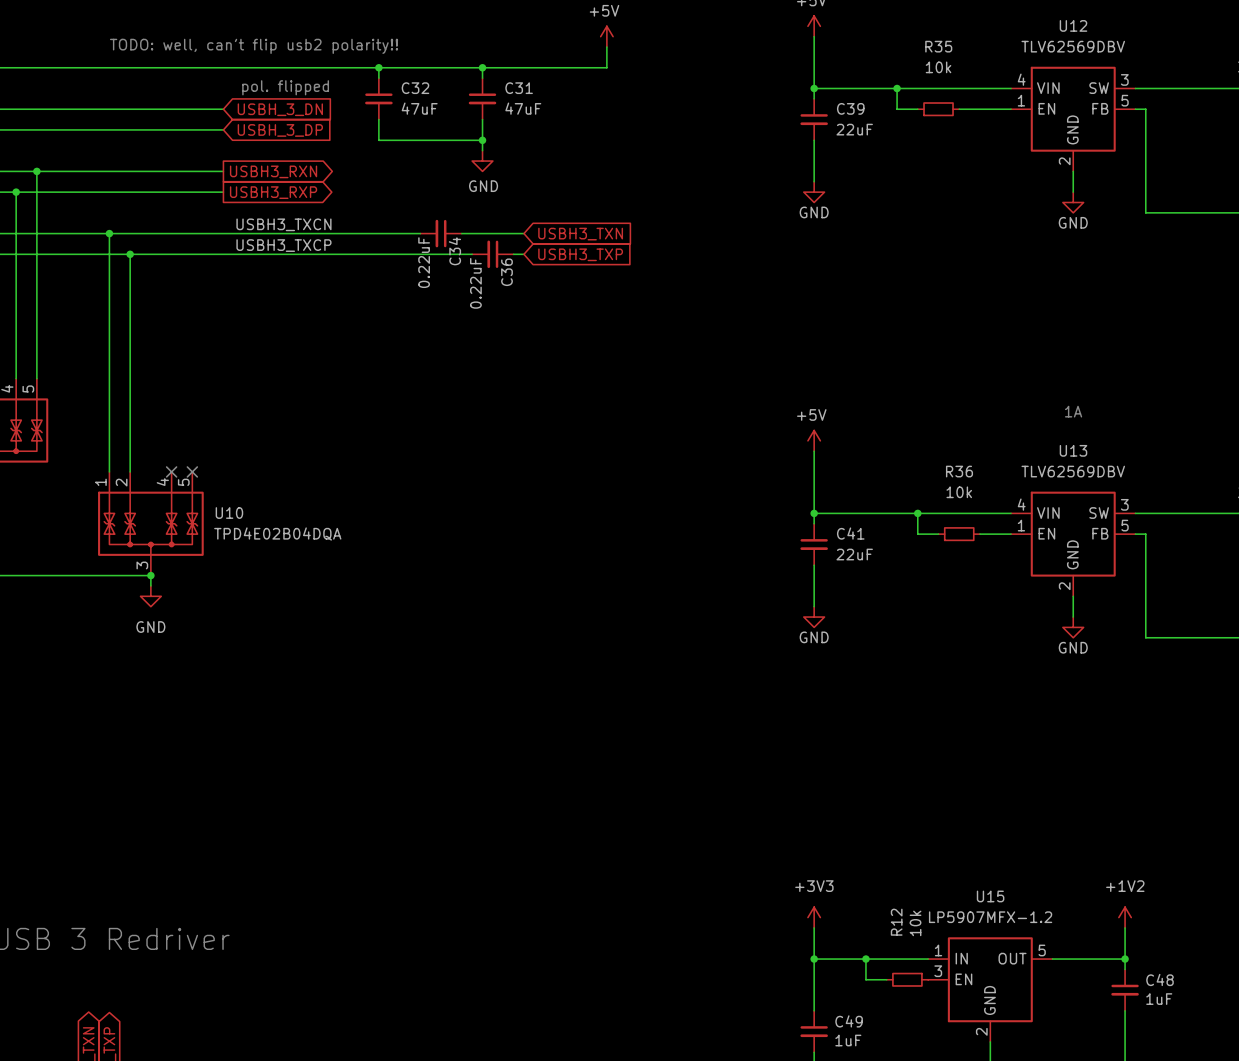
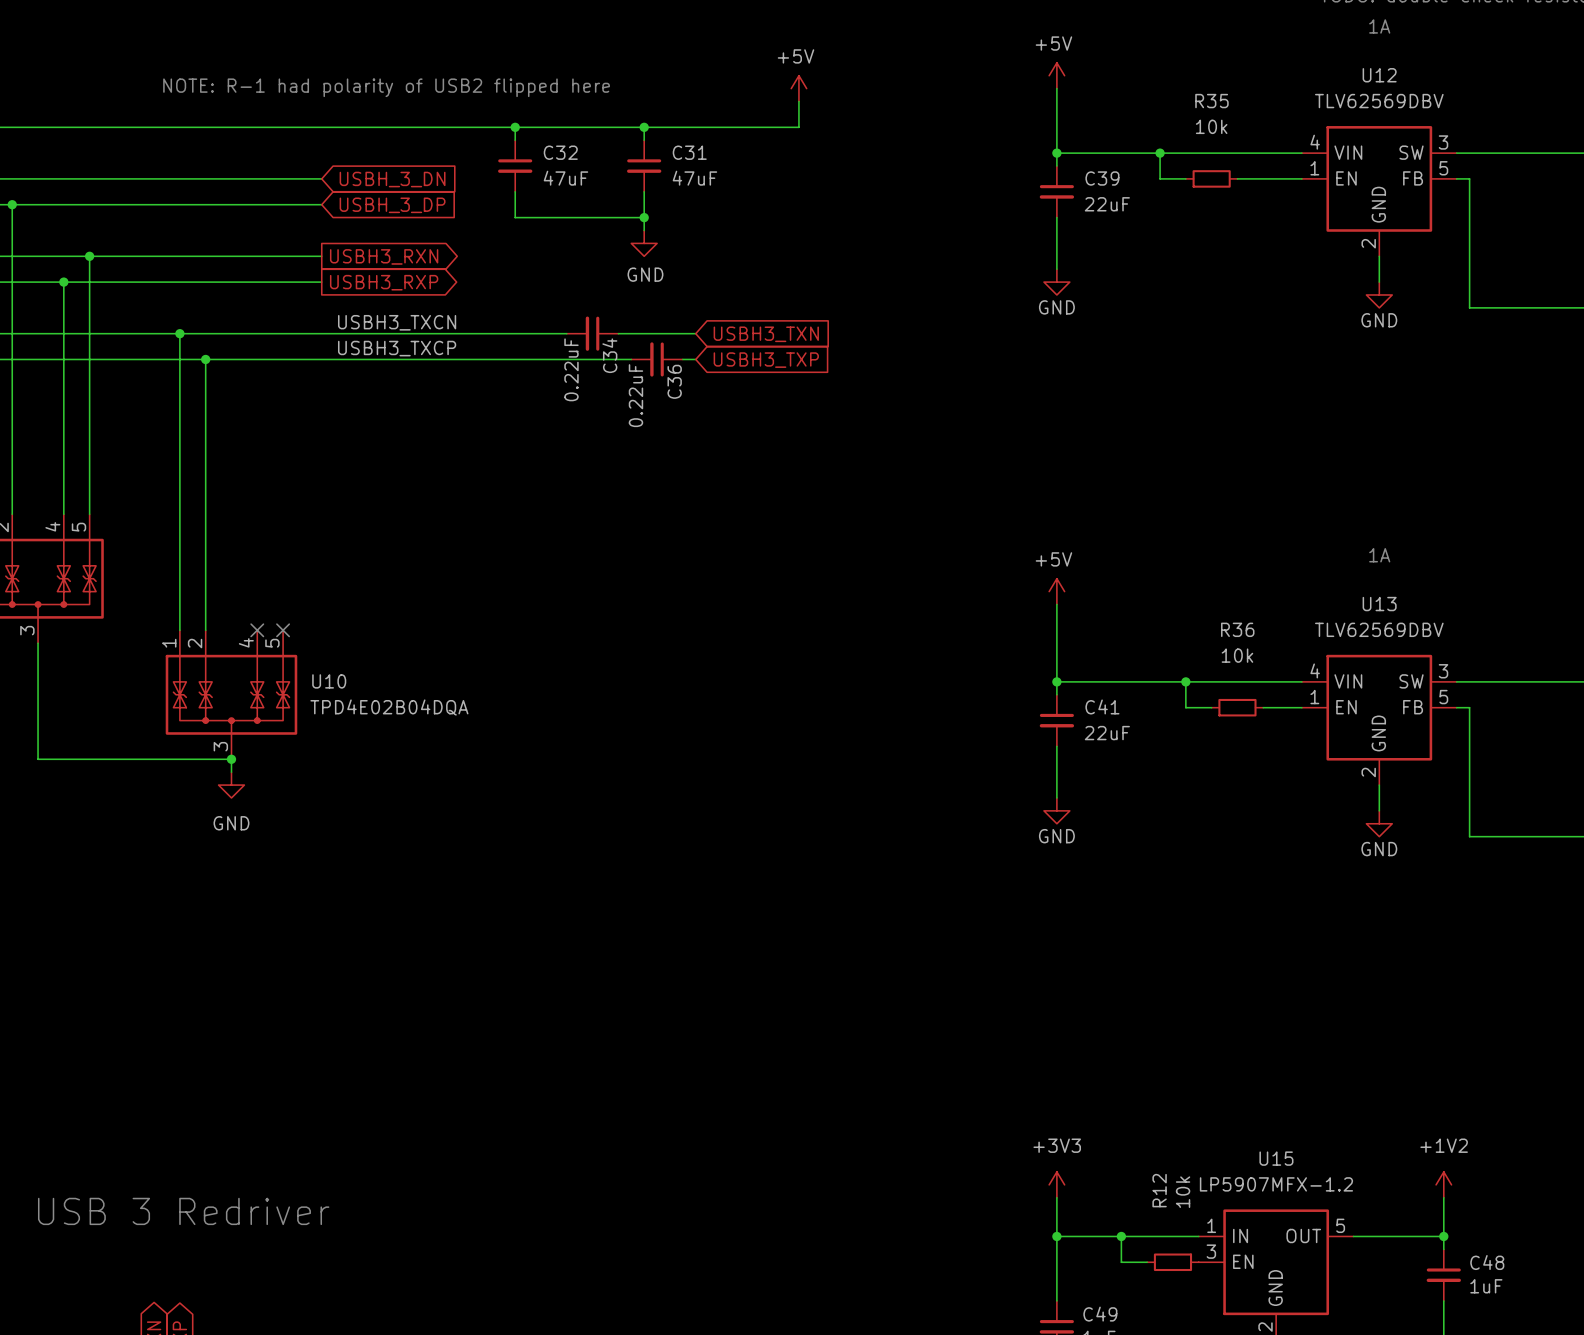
text: none -> NOTE: R-1 had polarity of USB2 flipped here (386, 87)
text: TODO: well, can't flip usb2 polarity!! (254, 46) -> none
text: pol. flipped (285, 87) -> none

